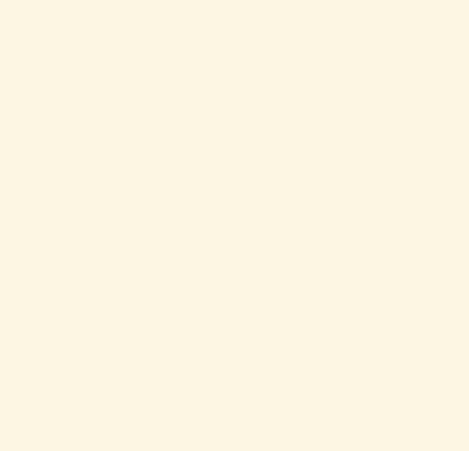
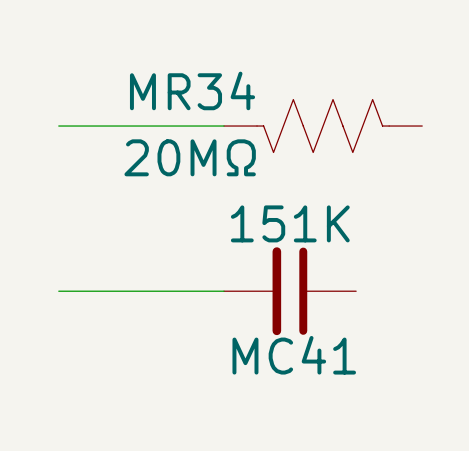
wire: none -> (58, 126) (223, 126)
MR34: none -> 20MΩ (323, 126)
wire: none -> (58, 291) (223, 291)
MC41: none -> 151K (290, 291)

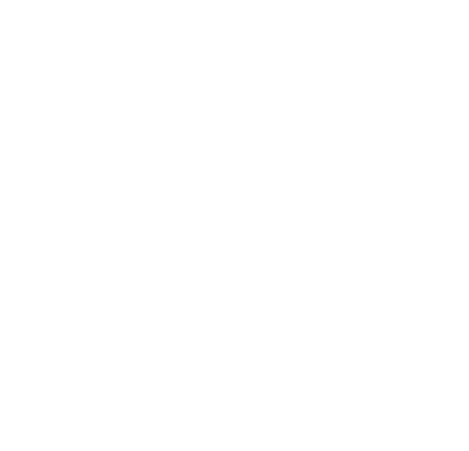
wire: (58, 126) (223, 126) -> none
MR34: 20MΩ (323, 126) -> none
wire: (58, 291) (223, 291) -> none
MC41: 151K (290, 291) -> none

